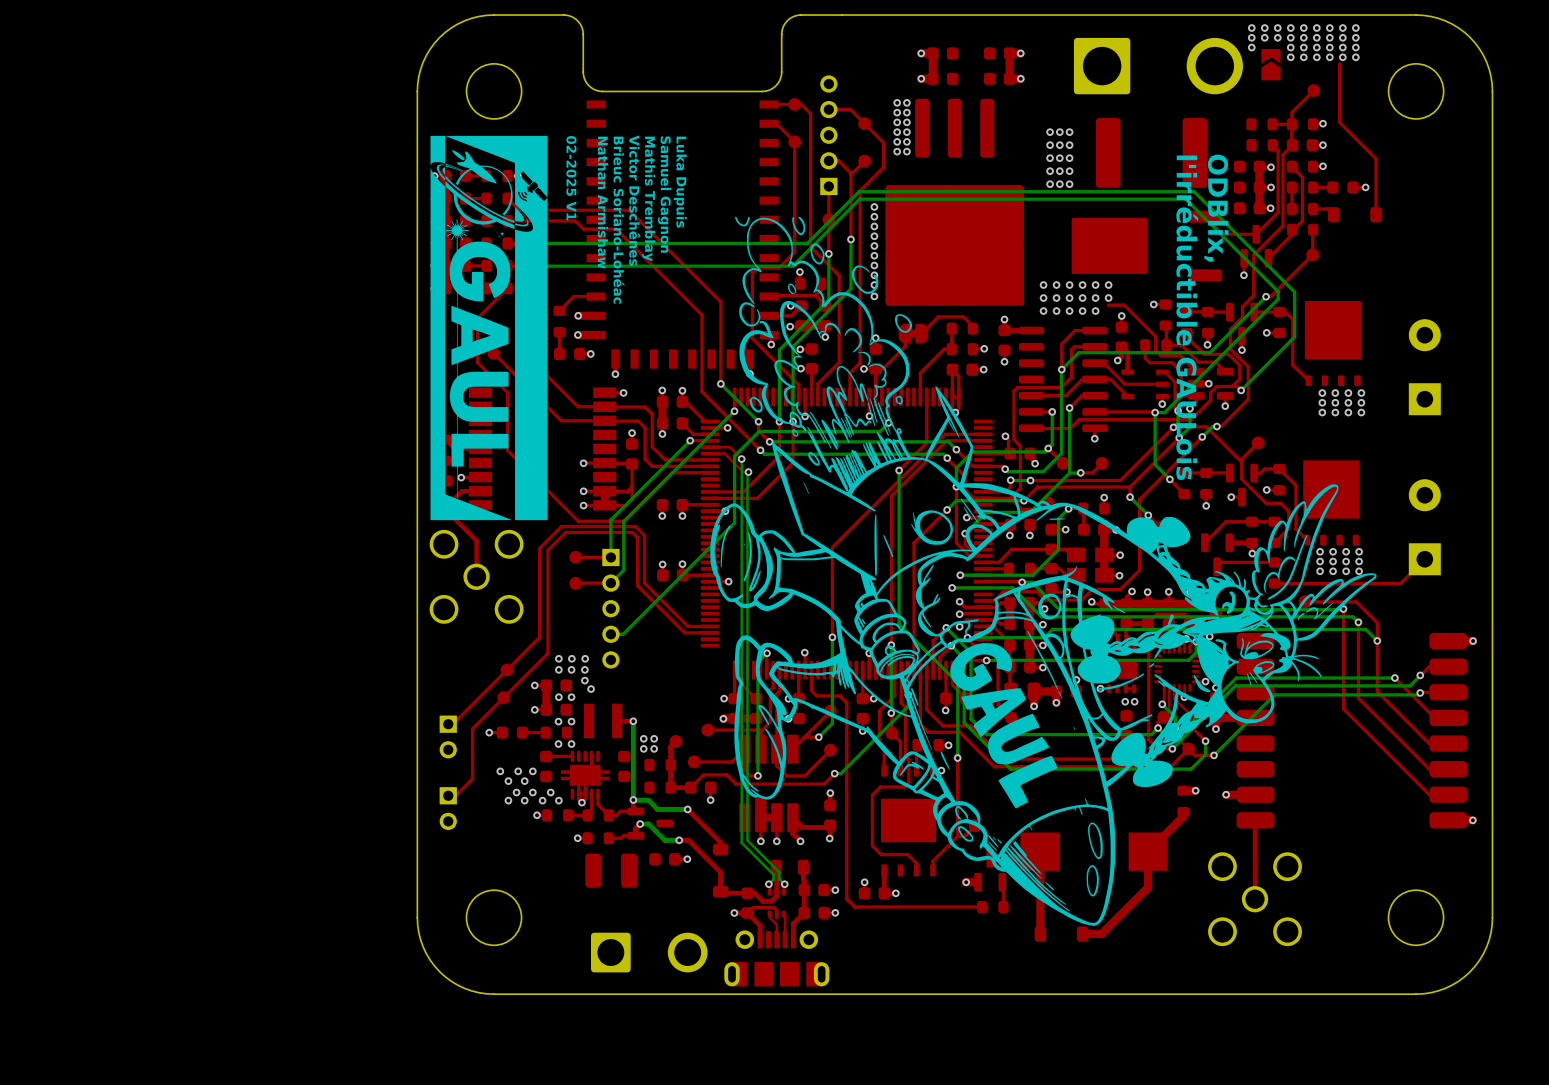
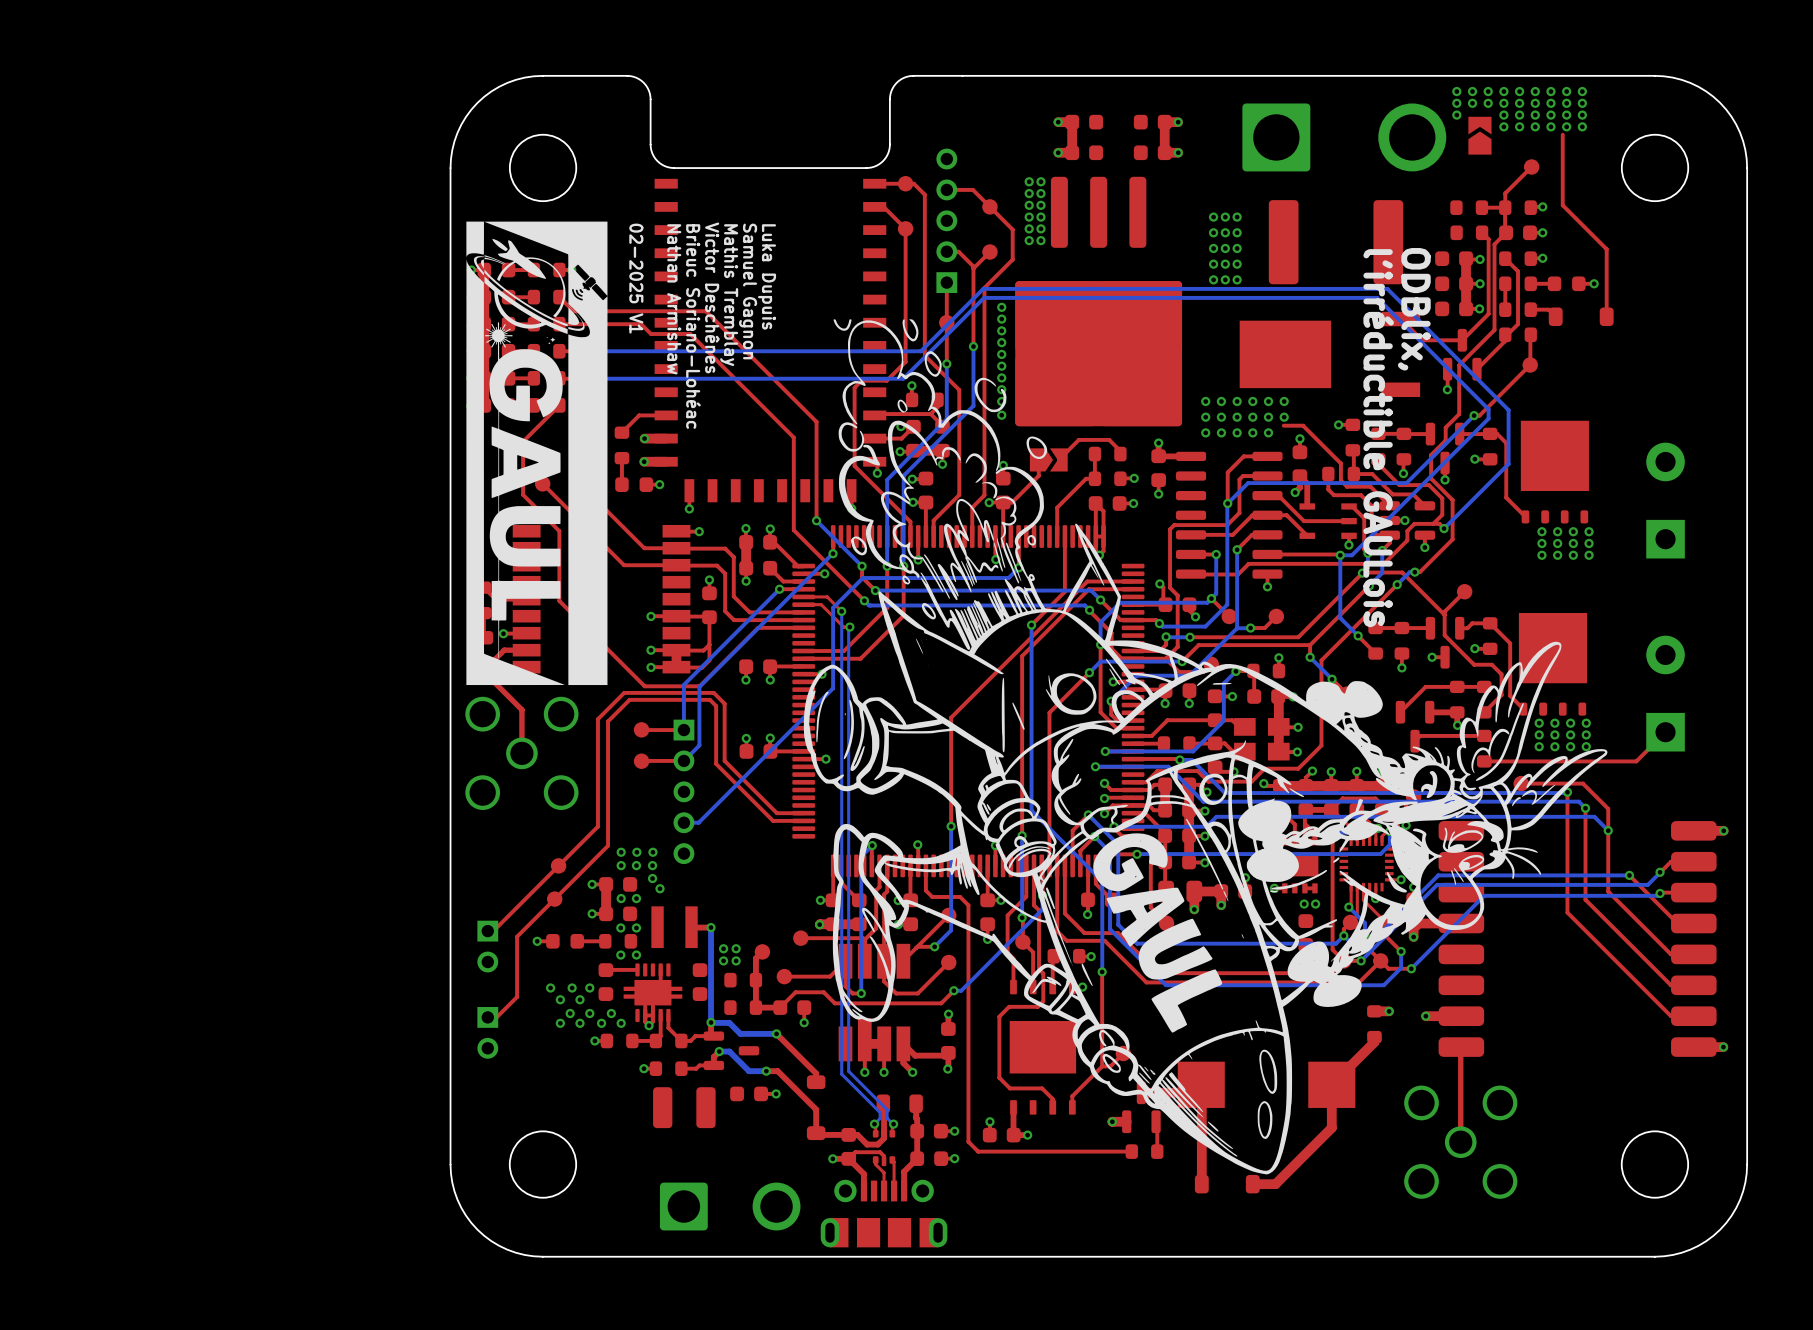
part footprint: [898, 323, 929, 344] -> [1029, 448, 1068, 472]

